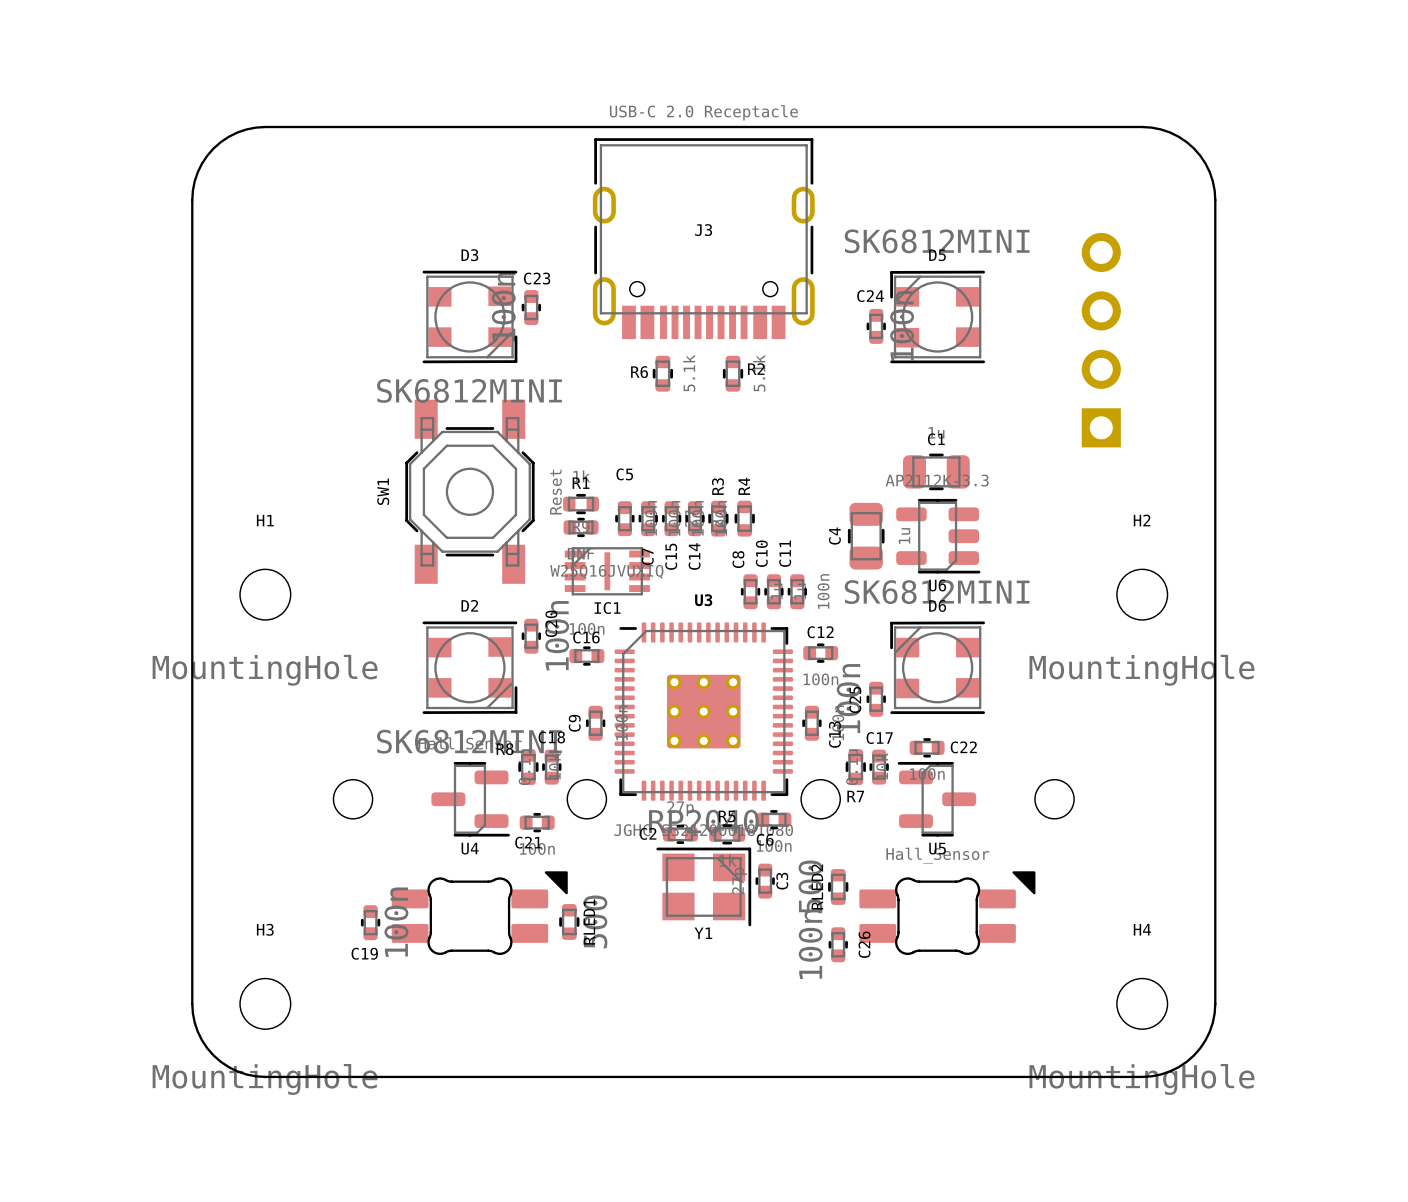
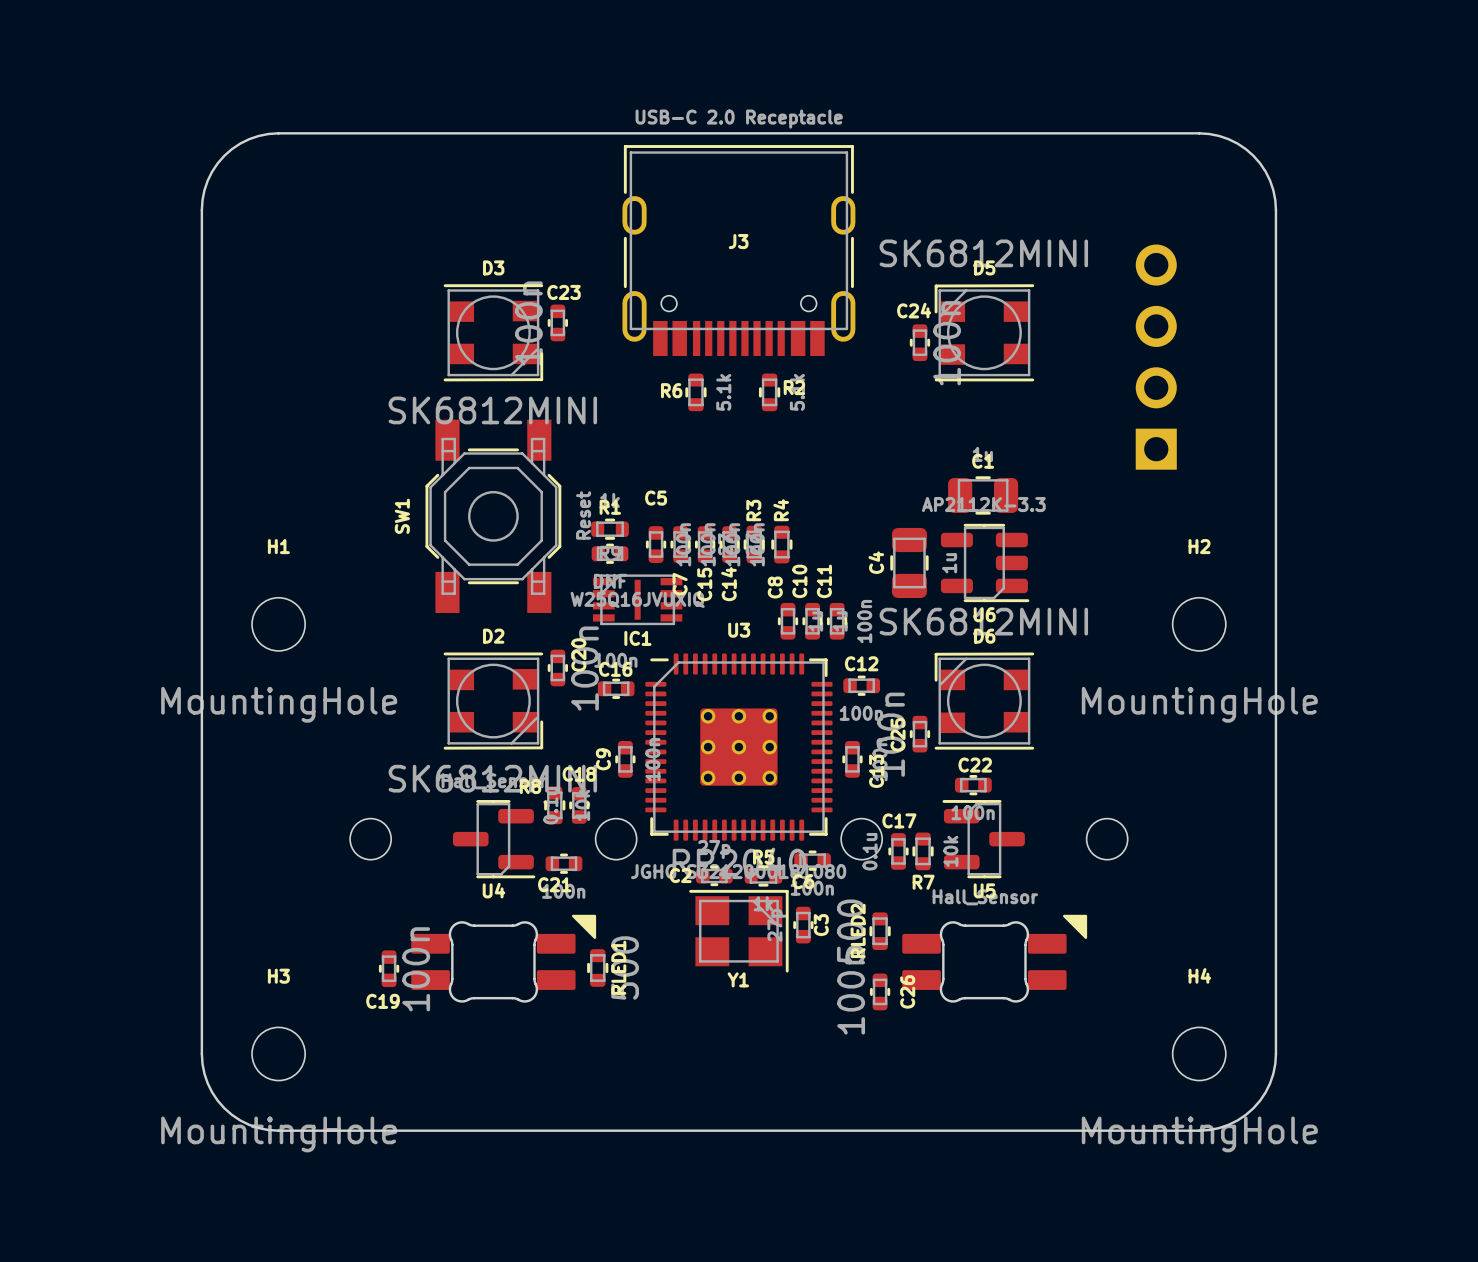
C22 name position: C22 (963, 747) -> C22 (975, 765)
R7 position: (855, 767) -> (923, 851)
C17 position: (879, 767) -> (898, 851)

